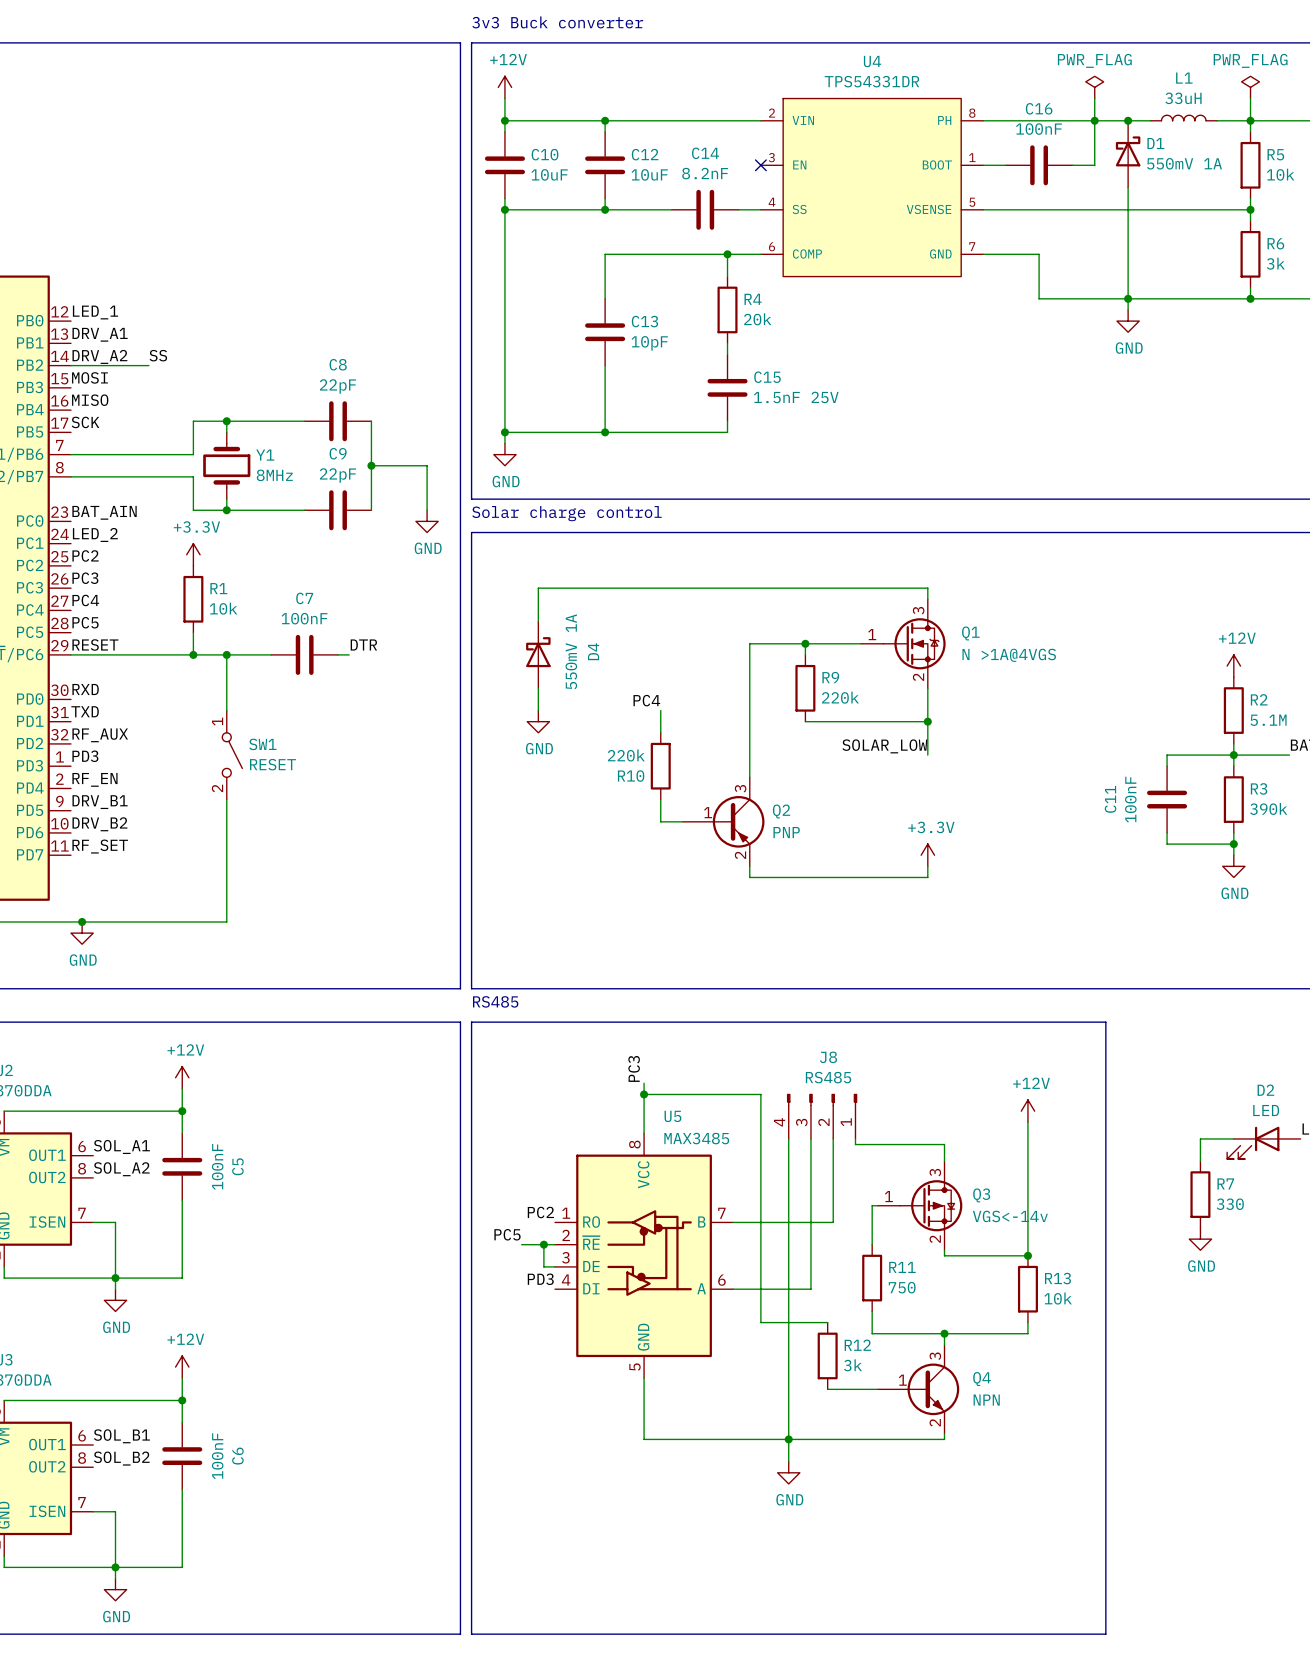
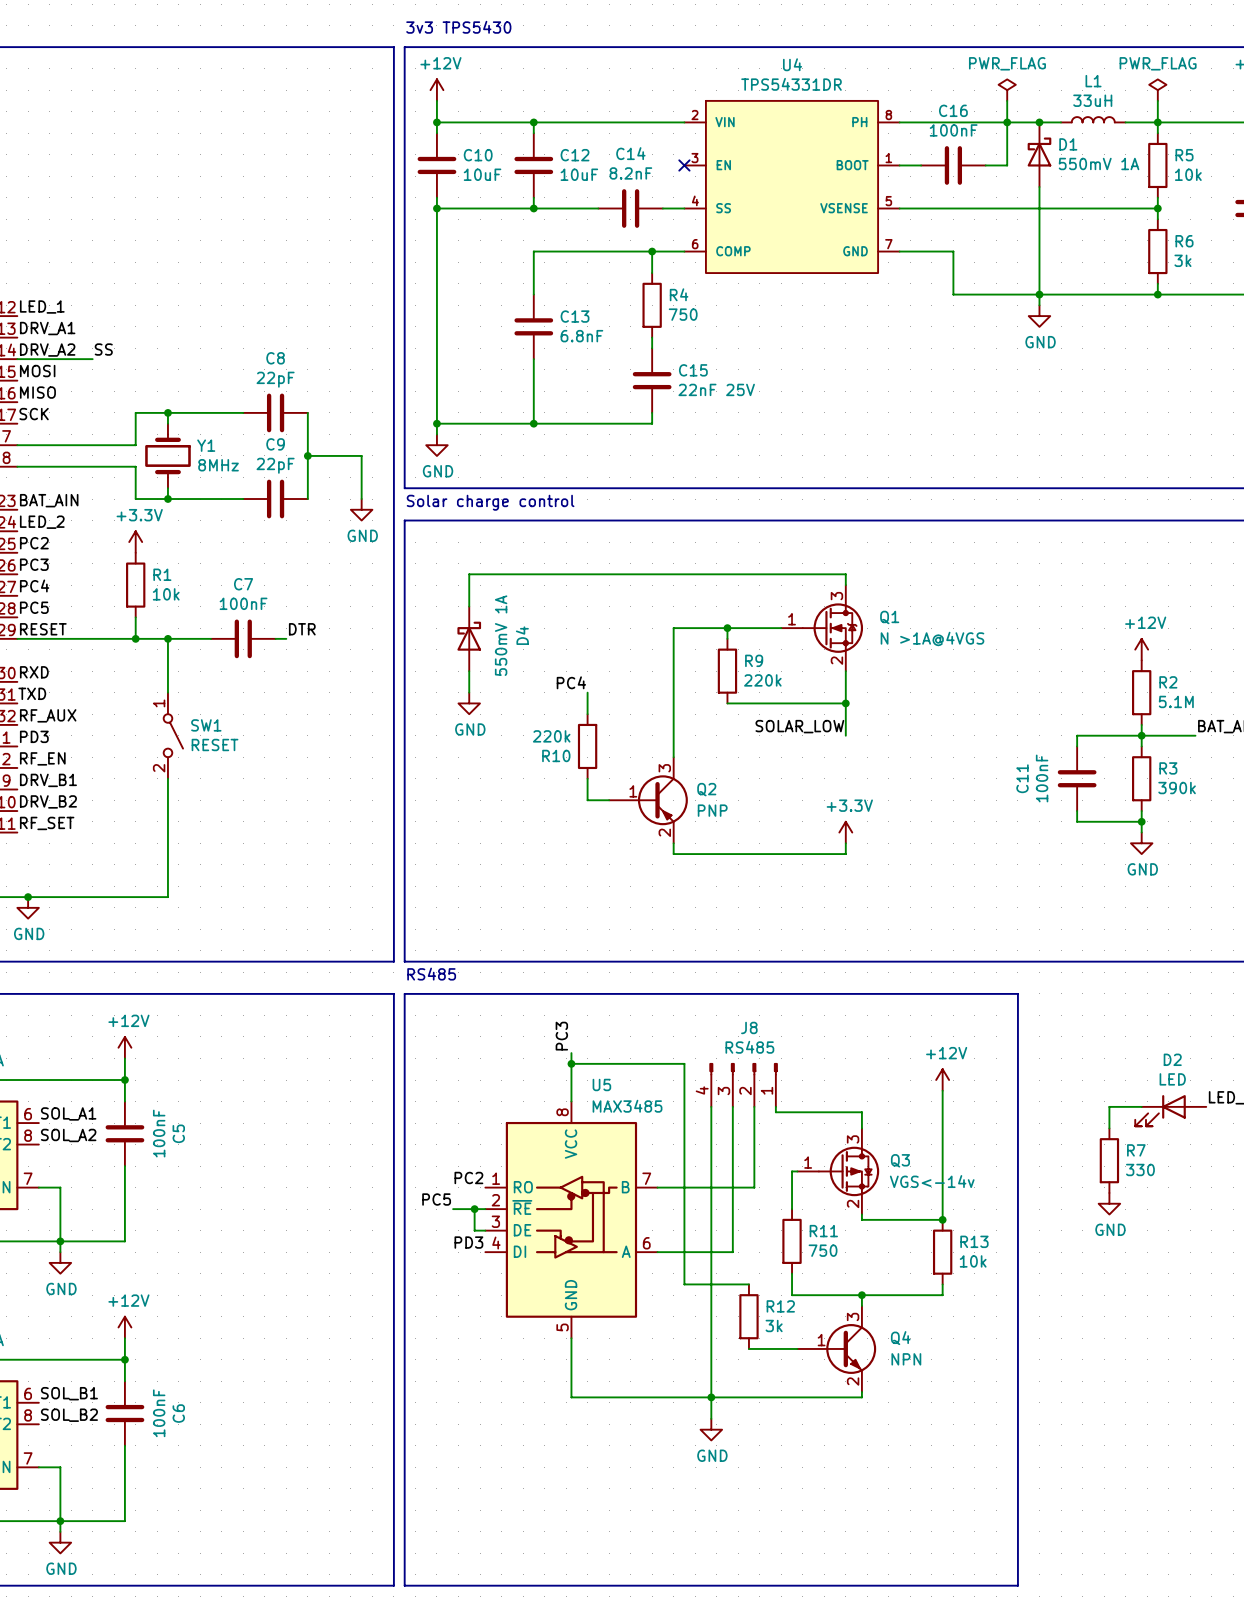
text: 3v3 Buck converter (557, 22) -> 3v3 TPS5430 (458, 27)
R4 value: 20k (757, 319) -> 750 (683, 314)
C13 value: 10pF (649, 343) -> 6.8nF (581, 336)
C15 value: 1.5nF 25V (796, 397) -> 22nF 25V (716, 389)

